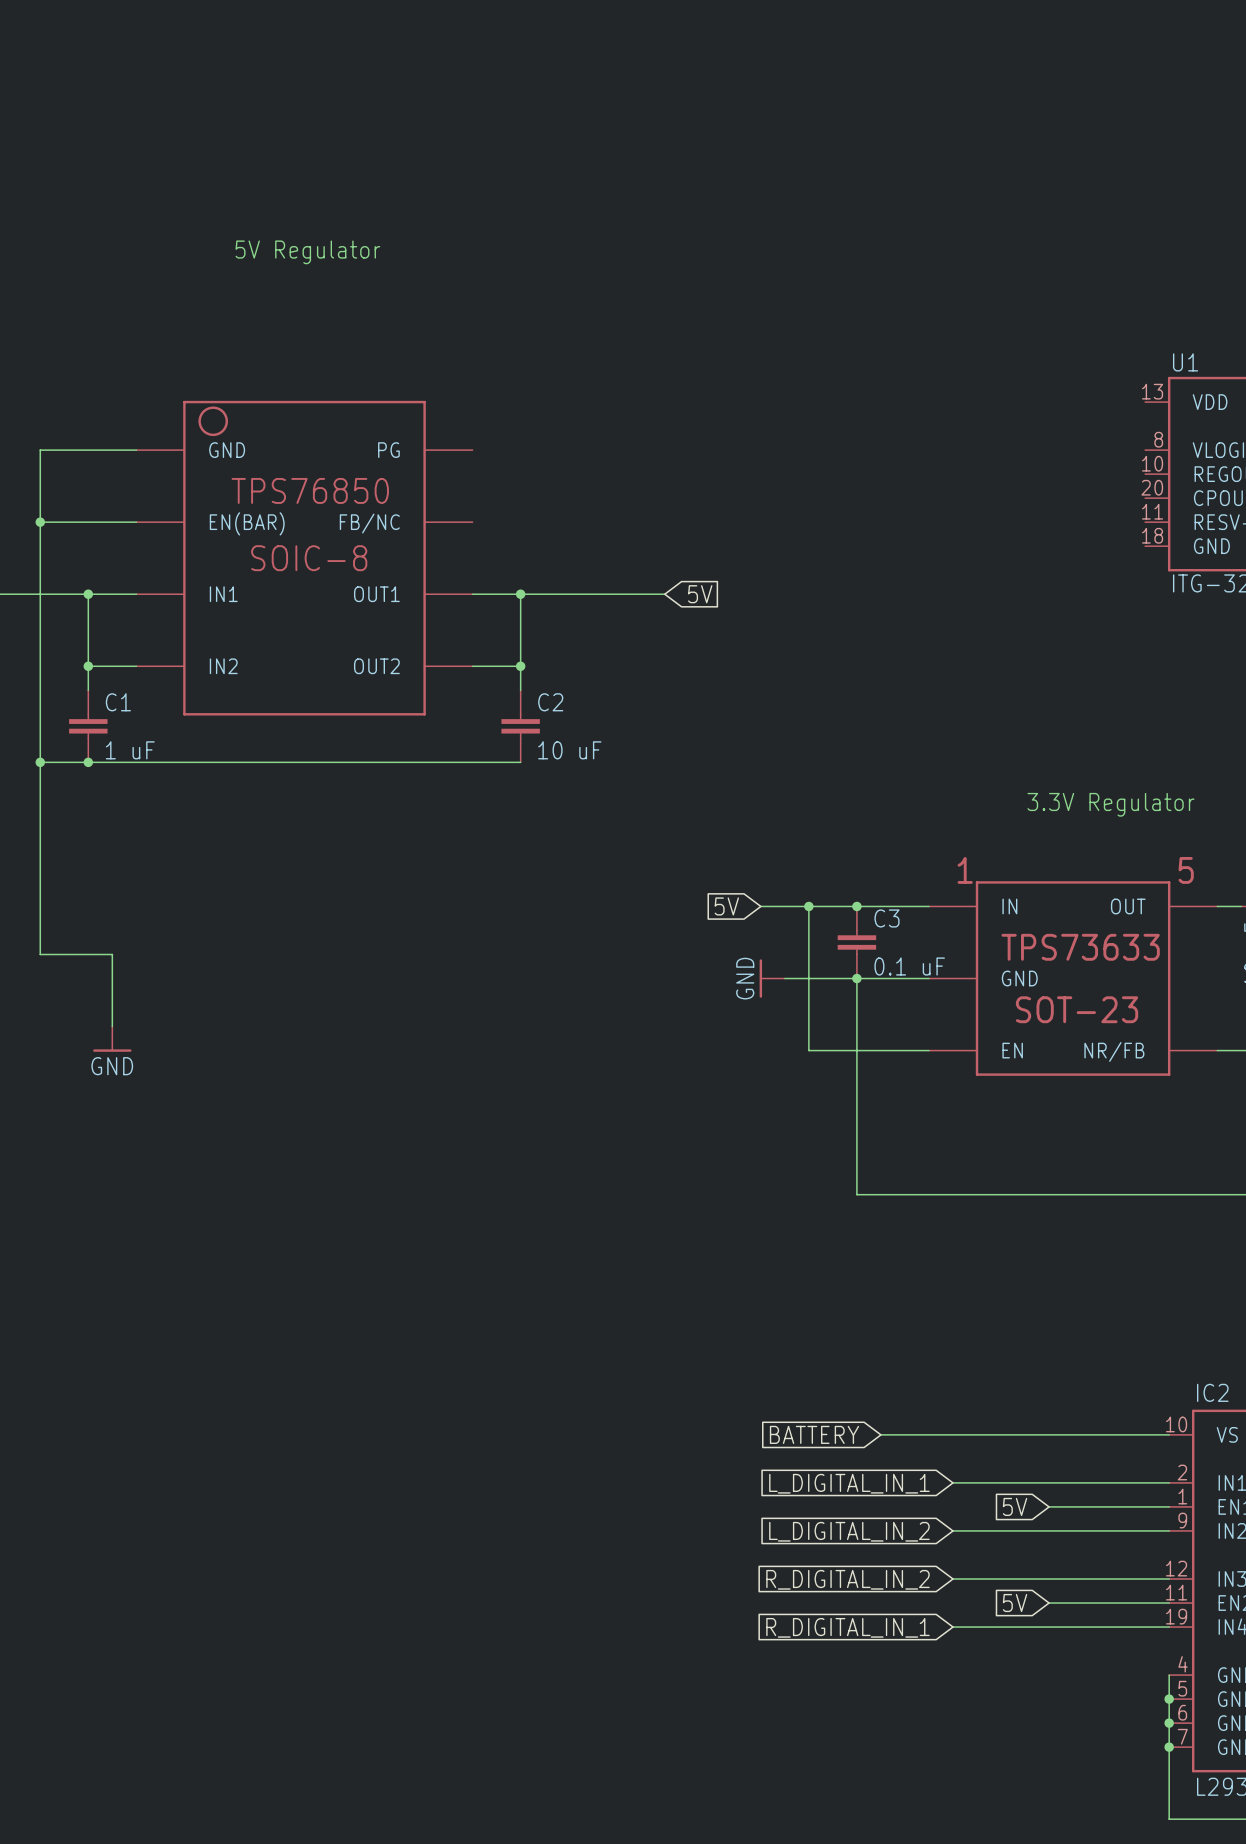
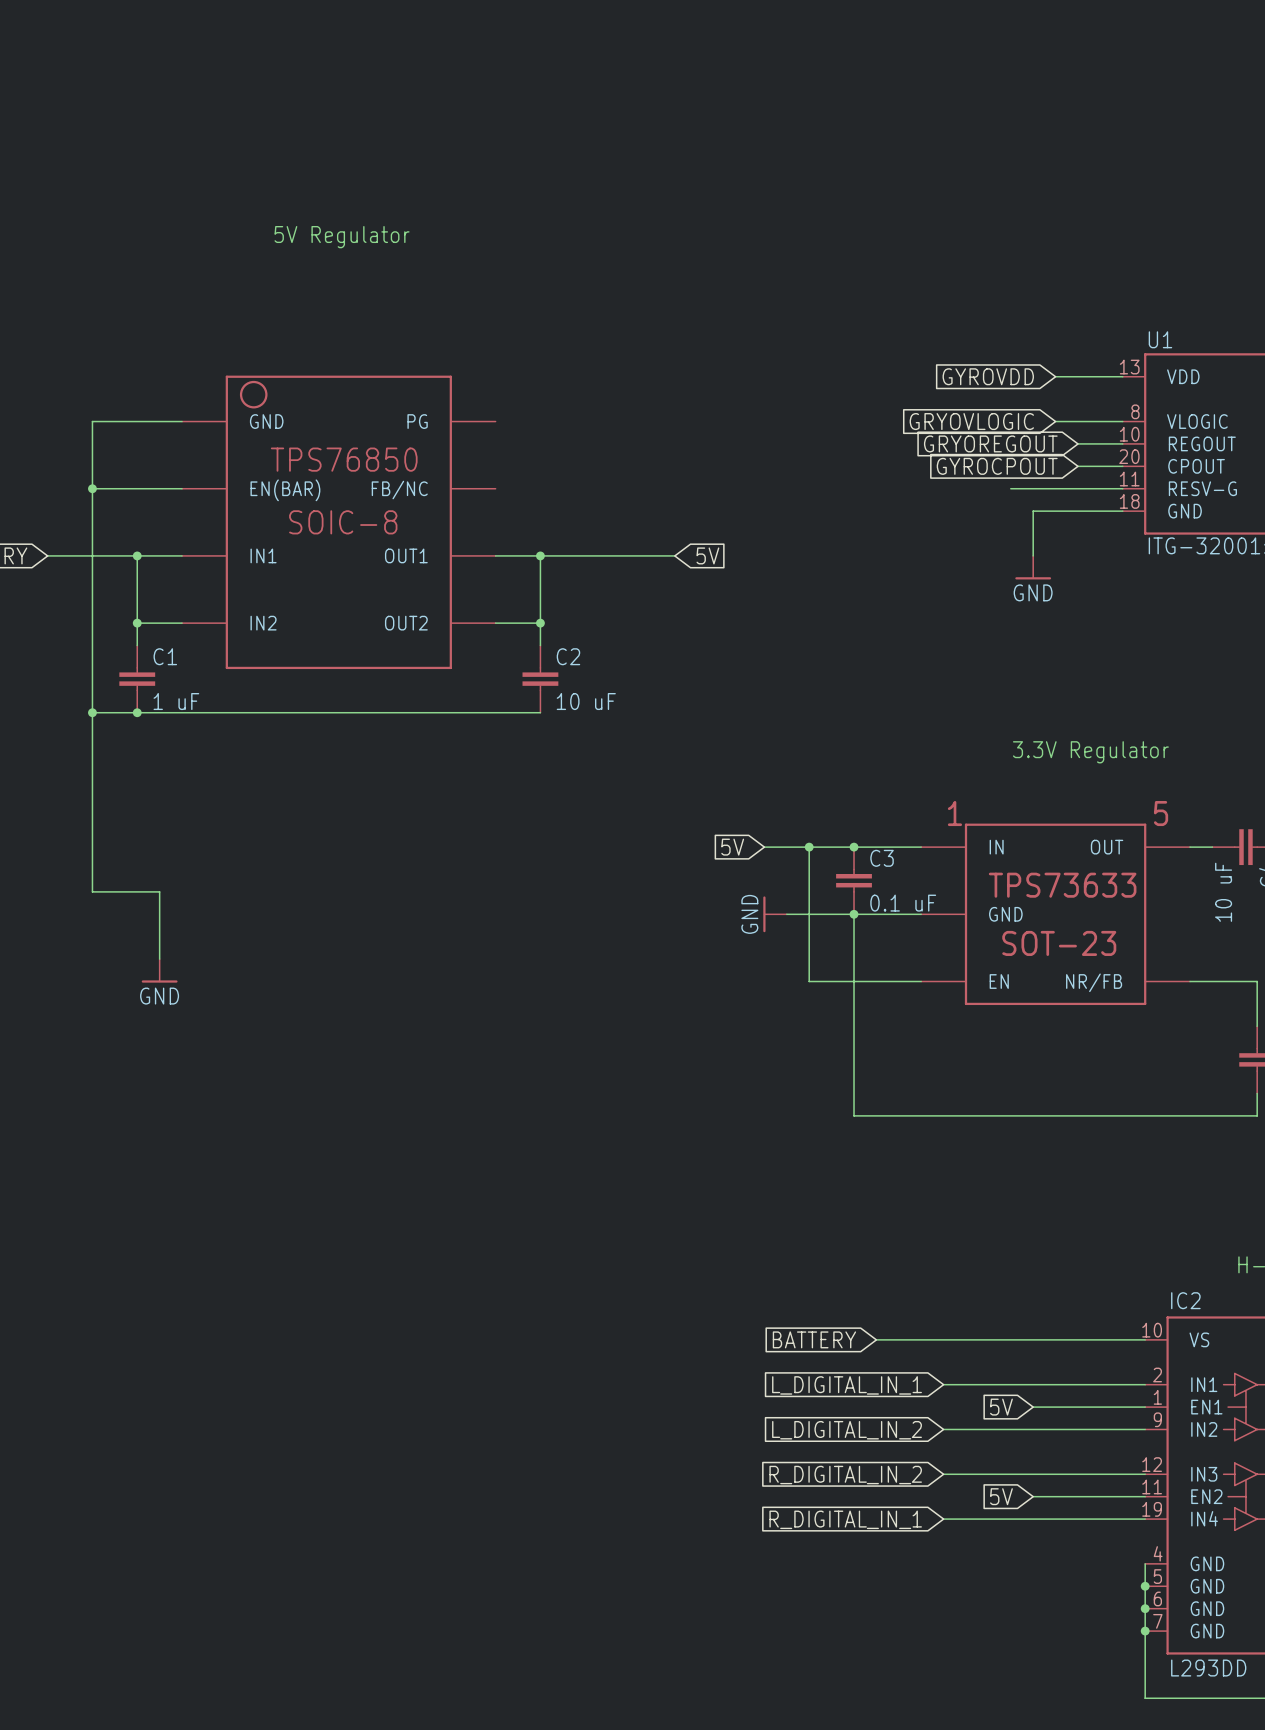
global label: none -> GYROVDD (988, 376)
wire: none -> (1055, 376) (1122, 376)
global label: none -> GRYOVLOGIC (971, 421)
wire: none -> (1055, 421) (1122, 421)
global label: none -> GRYOREGOUT (990, 443)
wire: none -> (1077, 443) (1122, 443)
global label: none -> GYROCPOUT (997, 466)
wire: none -> (1077, 466) (1122, 466)
wire: none -> (1010, 488) (1122, 488)
wire: none -> (1122, 511) (1033, 511) (1033, 555)
power symbol: none -> GND (1033, 567)

